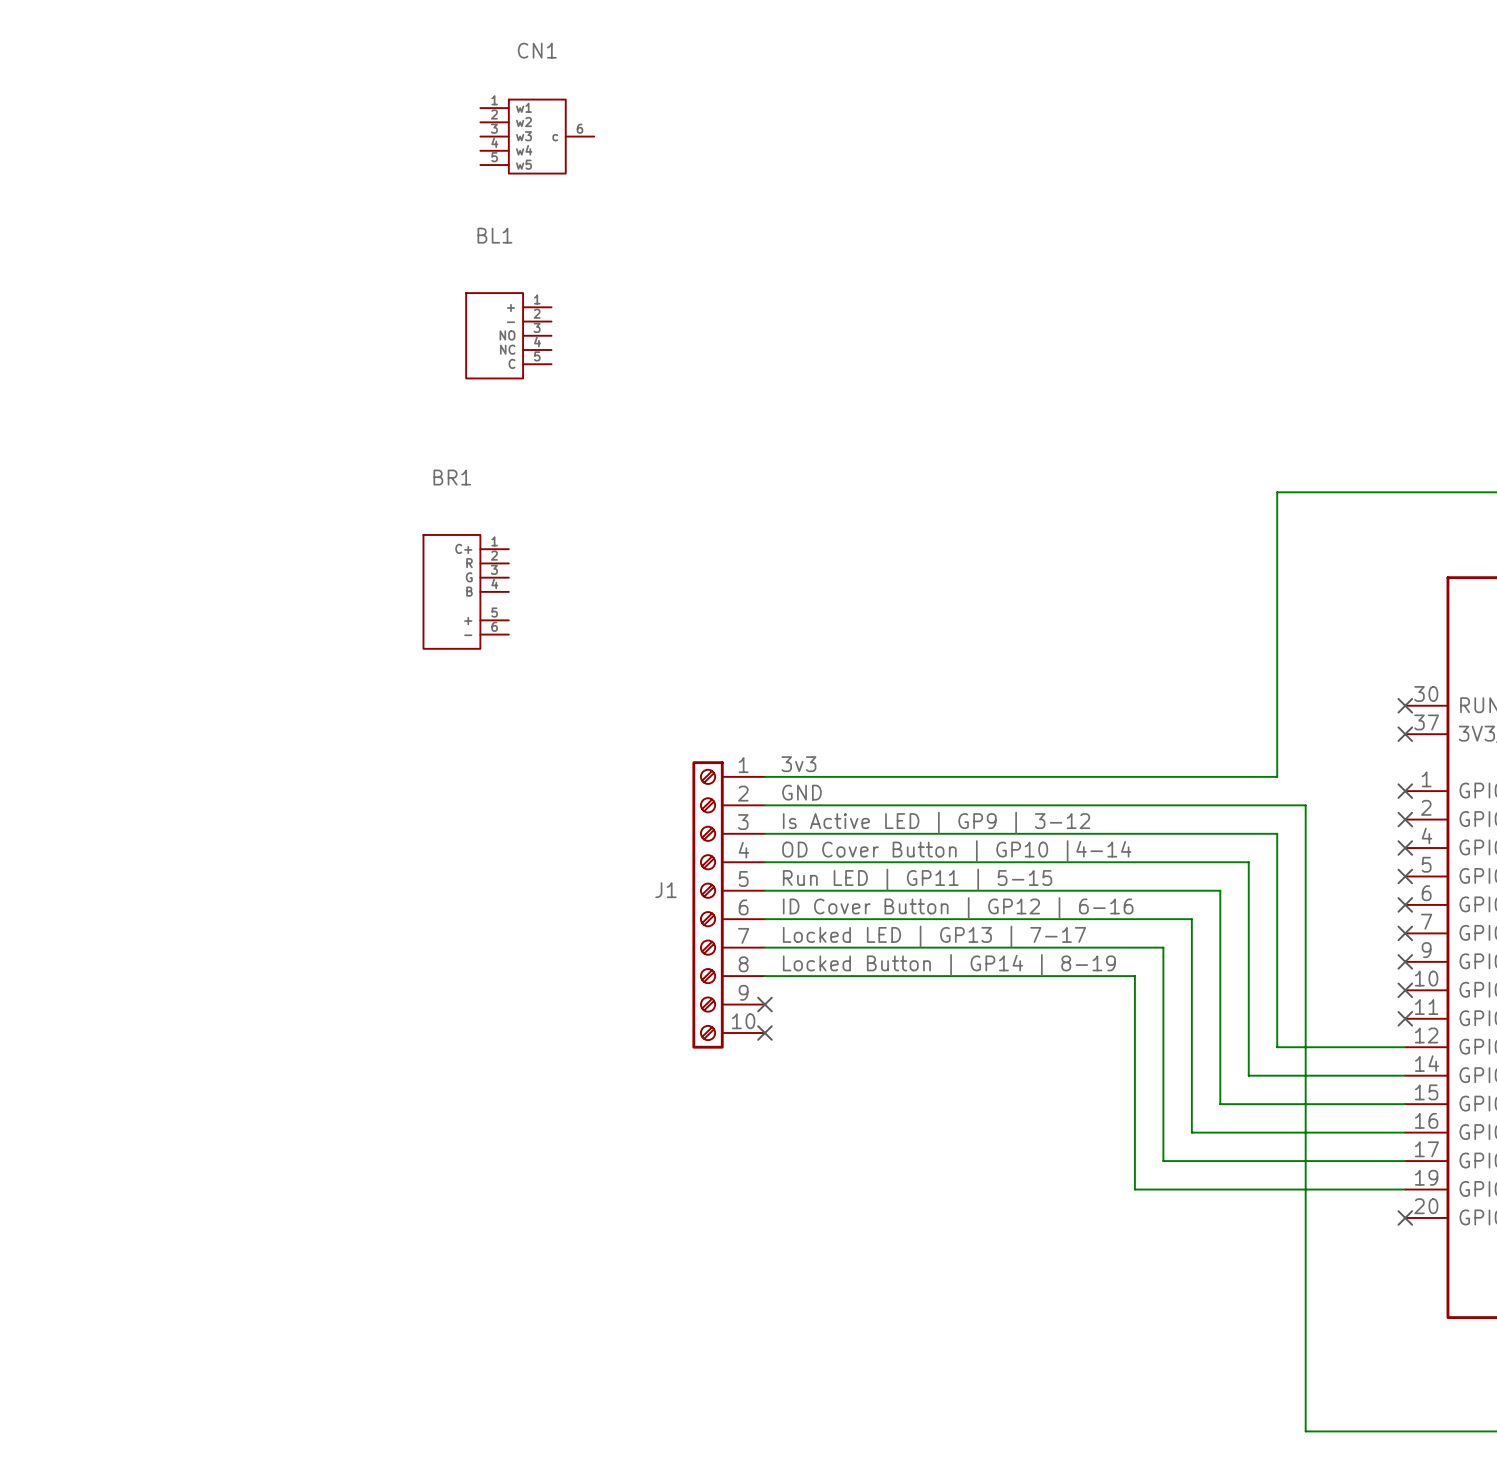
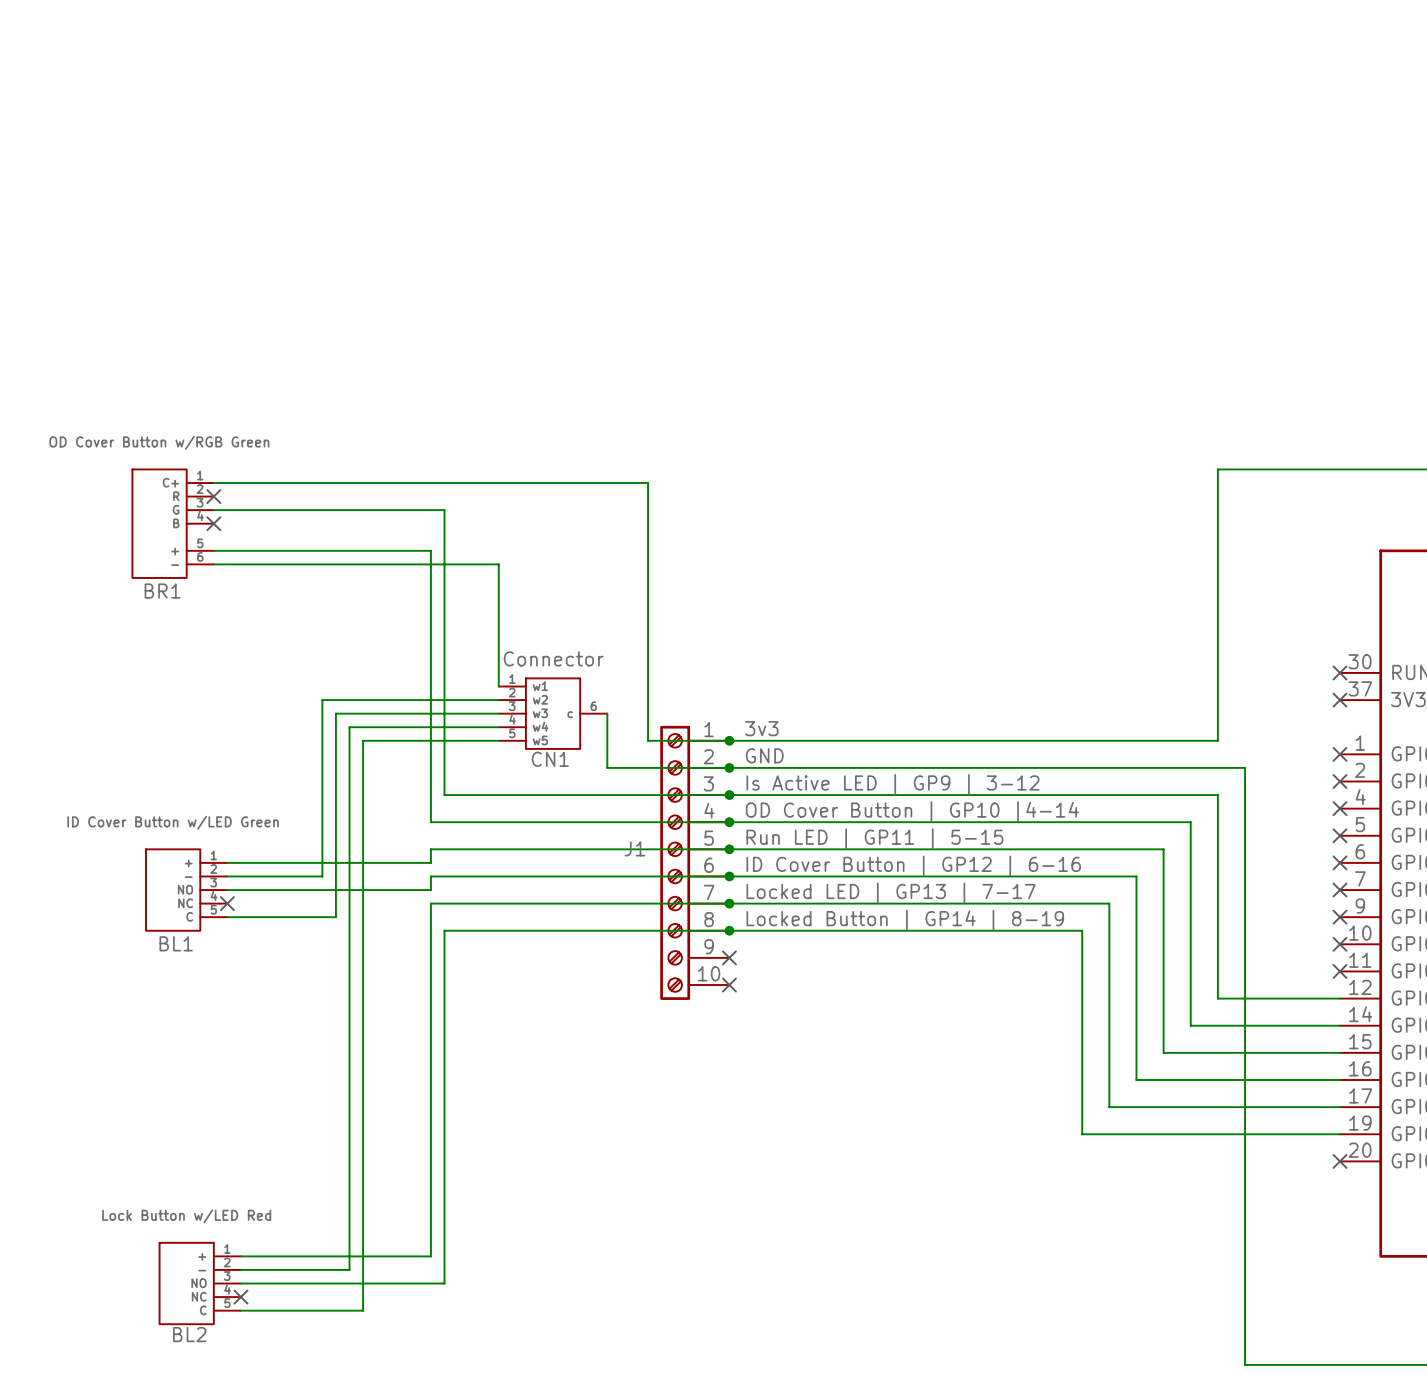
CN1 name position: CN1 (537, 50) -> CN1 (550, 759)
CN1 position: (537, 136) -> (553, 713)
BL1 name position: BL1 (494, 235) -> BL1 (176, 943)
BL1 position: (508, 335) -> (186, 890)
BR1 value: none -> OD Cover Button w/RGB Green (159, 442)
BR1 name position: BR1 (452, 477) -> BR1 (162, 591)
wire: none -> (213, 482) (648, 482) (648, 740) (729, 740)
no-connect mark: none -> (213, 496)
wire: none -> (213, 510) (444, 510) (444, 795) (729, 795)
no-connect mark: none -> (213, 523)
wire: none -> (213, 550) (430, 550) (430, 822) (729, 822)
wire: none -> (213, 564) (498, 564) (498, 686)
BR1 position: (466, 591) -> (173, 523)
CN1 value: none -> Connector (553, 658)
wire: none -> (498, 700) (322, 700) (322, 876) (227, 876)
wire: none -> (498, 713) (335, 713) (335, 917) (227, 917)
wire: none -> (607, 713) (607, 767) (729, 767)
wire: none -> (498, 727) (349, 727) (349, 1269) (240, 1269)
wire: none -> (498, 740) (363, 740) (363, 1310) (240, 1310)
junction: none -> (729, 740)
junction: none -> (729, 767)
junction: none -> (729, 795)
BL1 value: none -> ID Cover Button w/LED Green (173, 822)
junction: none -> (729, 822)
wire: none -> (729, 849) (430, 849) (430, 862) (227, 862)
junction: none -> (729, 849)
wire: none -> (729, 876) (430, 876) (430, 890) (227, 890)
junction: none -> (729, 876)
no-connect mark: none -> (227, 903)
wire: none -> (729, 903) (430, 903) (430, 1256) (240, 1256)
junction: none -> (729, 903)
wire: none -> (729, 930) (444, 930) (444, 1283) (240, 1283)
junction: none -> (729, 930)
BL2: none -> Lock Button w/LED Red (200, 1283)
no-connect mark: none -> (240, 1297)

